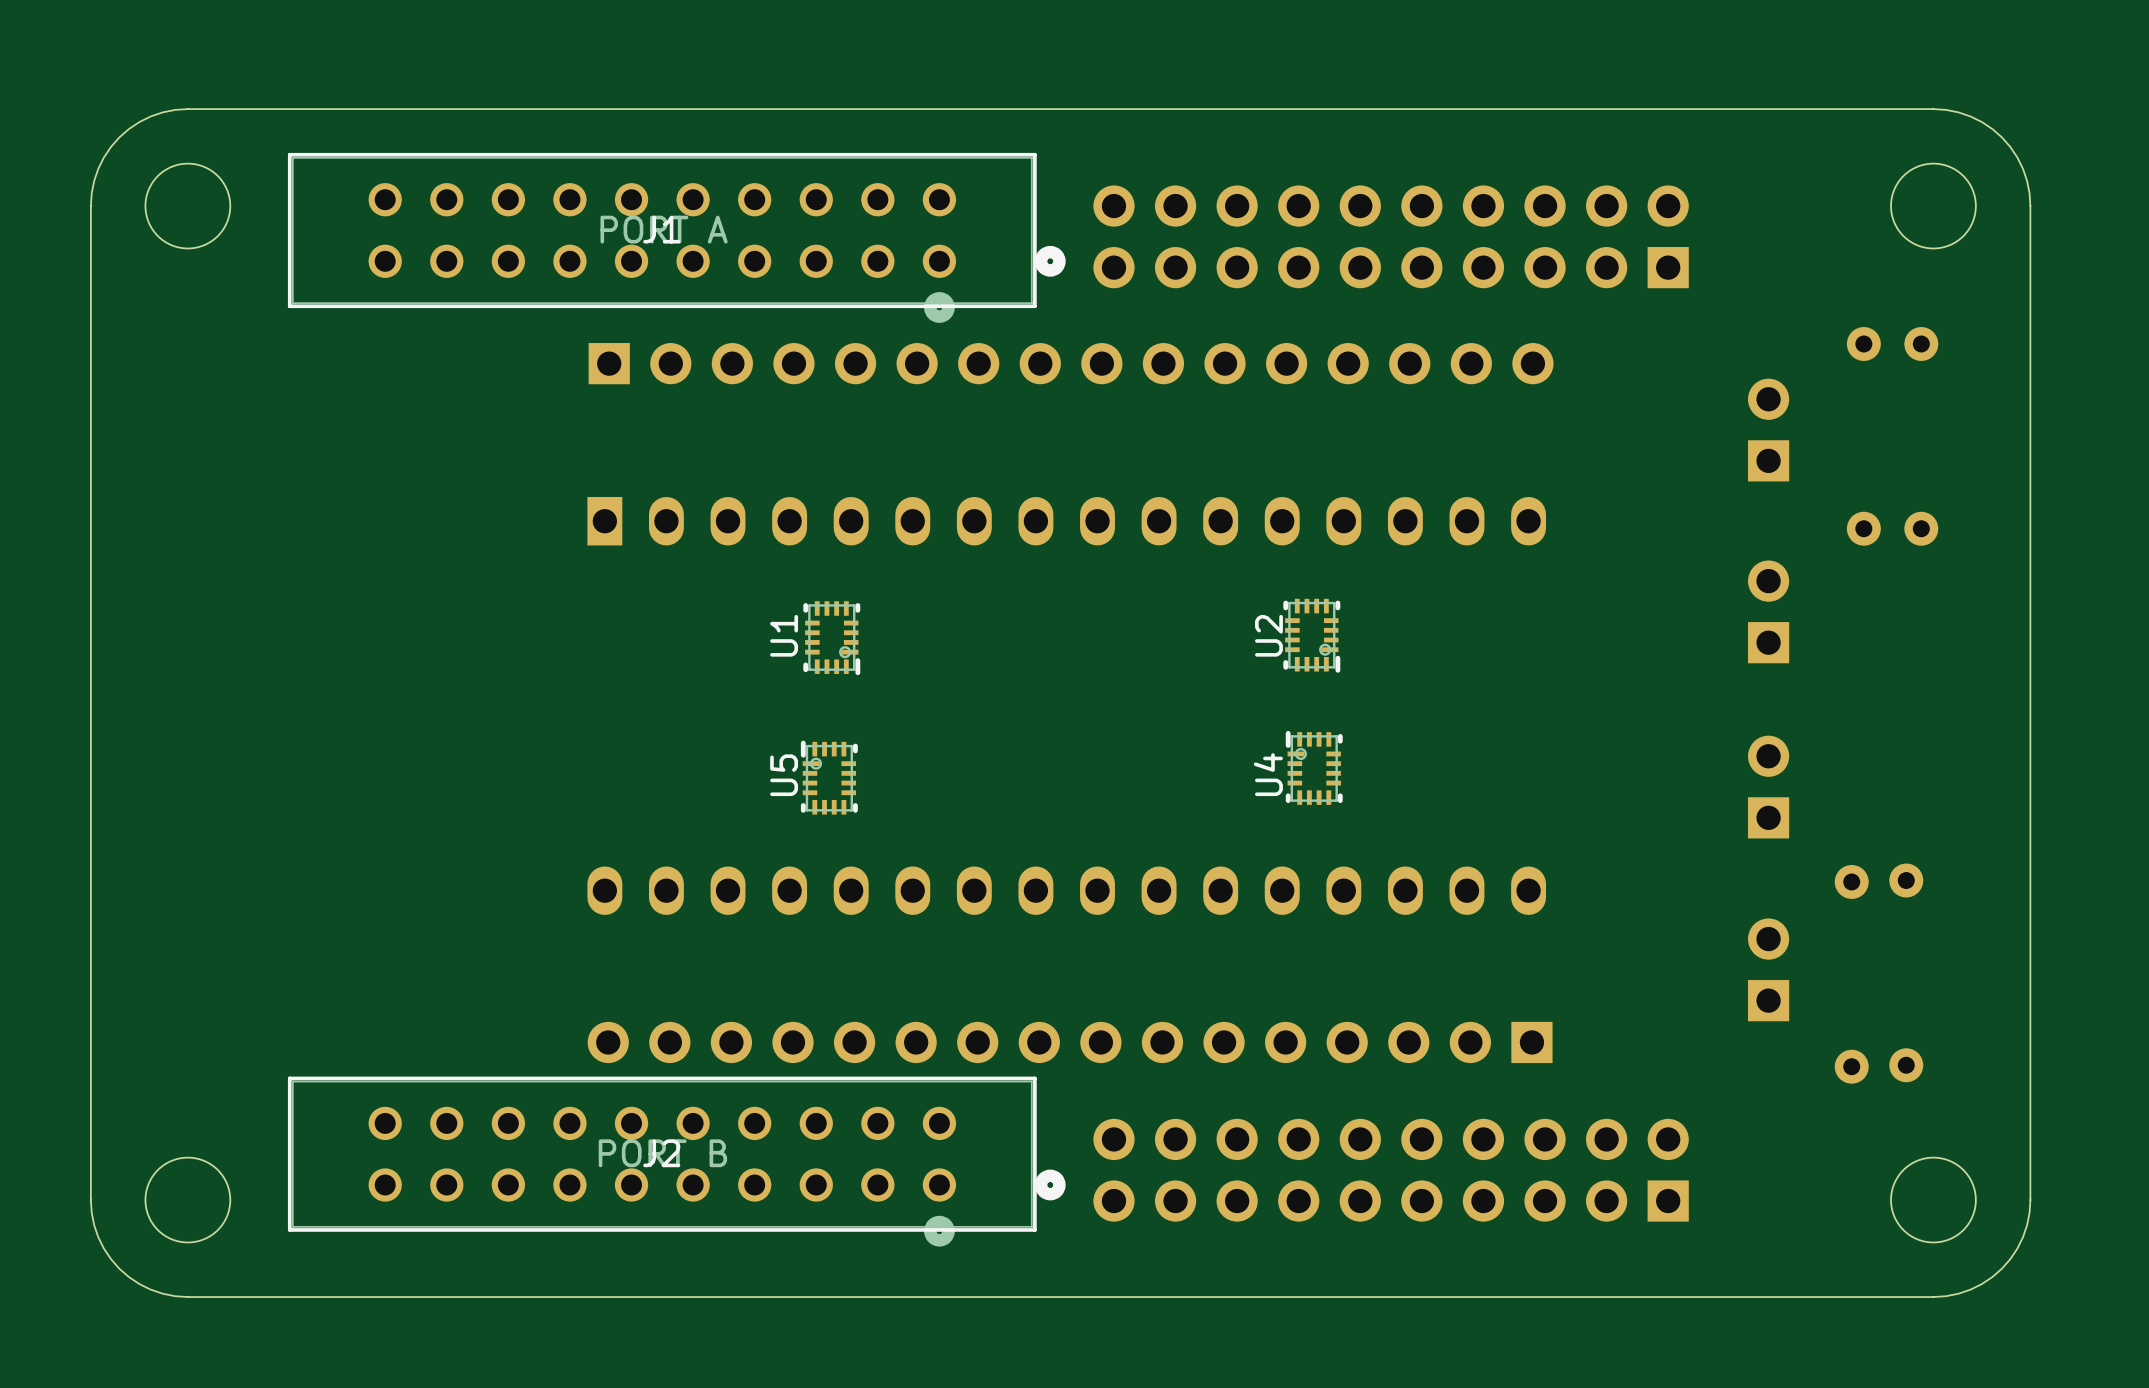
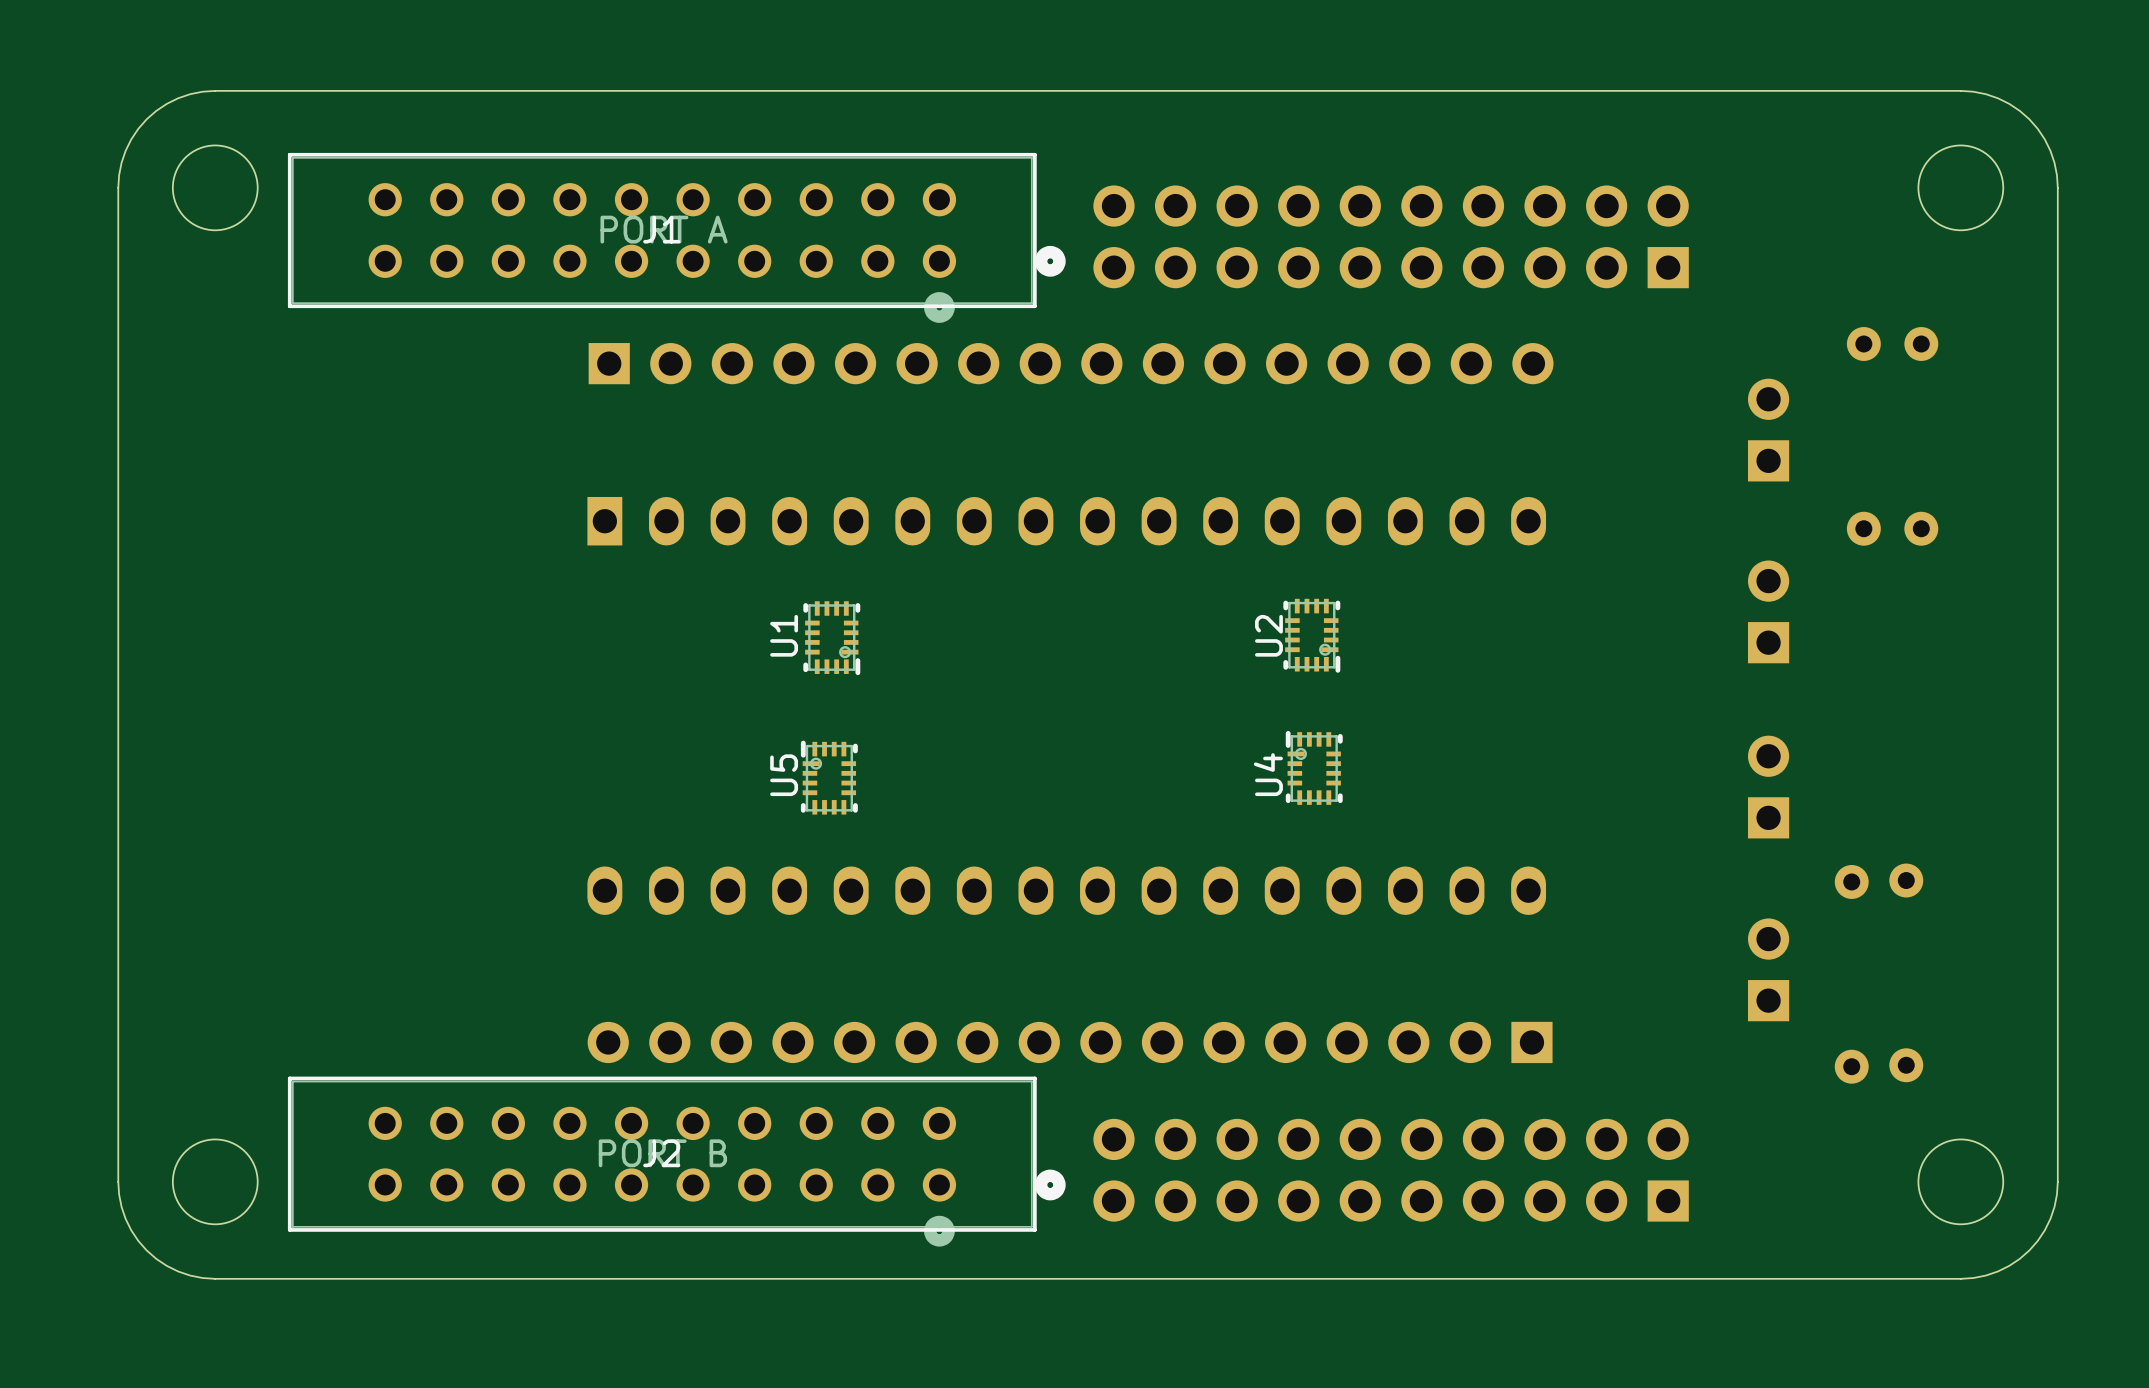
board edge: (1933, 109) (187, 109) (162, 112) (139, 122) (119, 137) (103, 157) (94, 180) (90, 206) (90, 1200) (94, 1225) (103, 1248) (119, 1268) (139, 1284) (162, 1293) (187, 1297) (1933, 1297) (1958, 1293) (1981, 1284) (2002, 1268) (2017, 1248) (2027, 1225) (2030, 1200) (2030, 206) (2029, 193) (2023, 168) (2017, 157) (2002, 137) (1981, 122) (1970, 116) (1946, 109) (1933, 109) -> (1960, 90) (215, 90) (190, 94) (166, 103) (146, 119) (131, 139) (121, 162) (118, 187) (118, 1181) (121, 1206) (131, 1230) (146, 1250) (166, 1265) (190, 1275) (215, 1278) (1960, 1278) (1985, 1275) (2009, 1265) (2029, 1250) (2044, 1230) (2054, 1206) (2057, 1181) (2057, 187) (2056, 175) (2050, 150) (2044, 139) (2029, 119) (2009, 103) (1997, 98) (1973, 91) (1960, 90)
round board edge position: (187, 206) -> (215, 187)
round board edge position: (1933, 206) -> (1960, 187)
round board edge position: (187, 1200) -> (215, 1181)
round board edge position: (1933, 1200) -> (1960, 1181)

